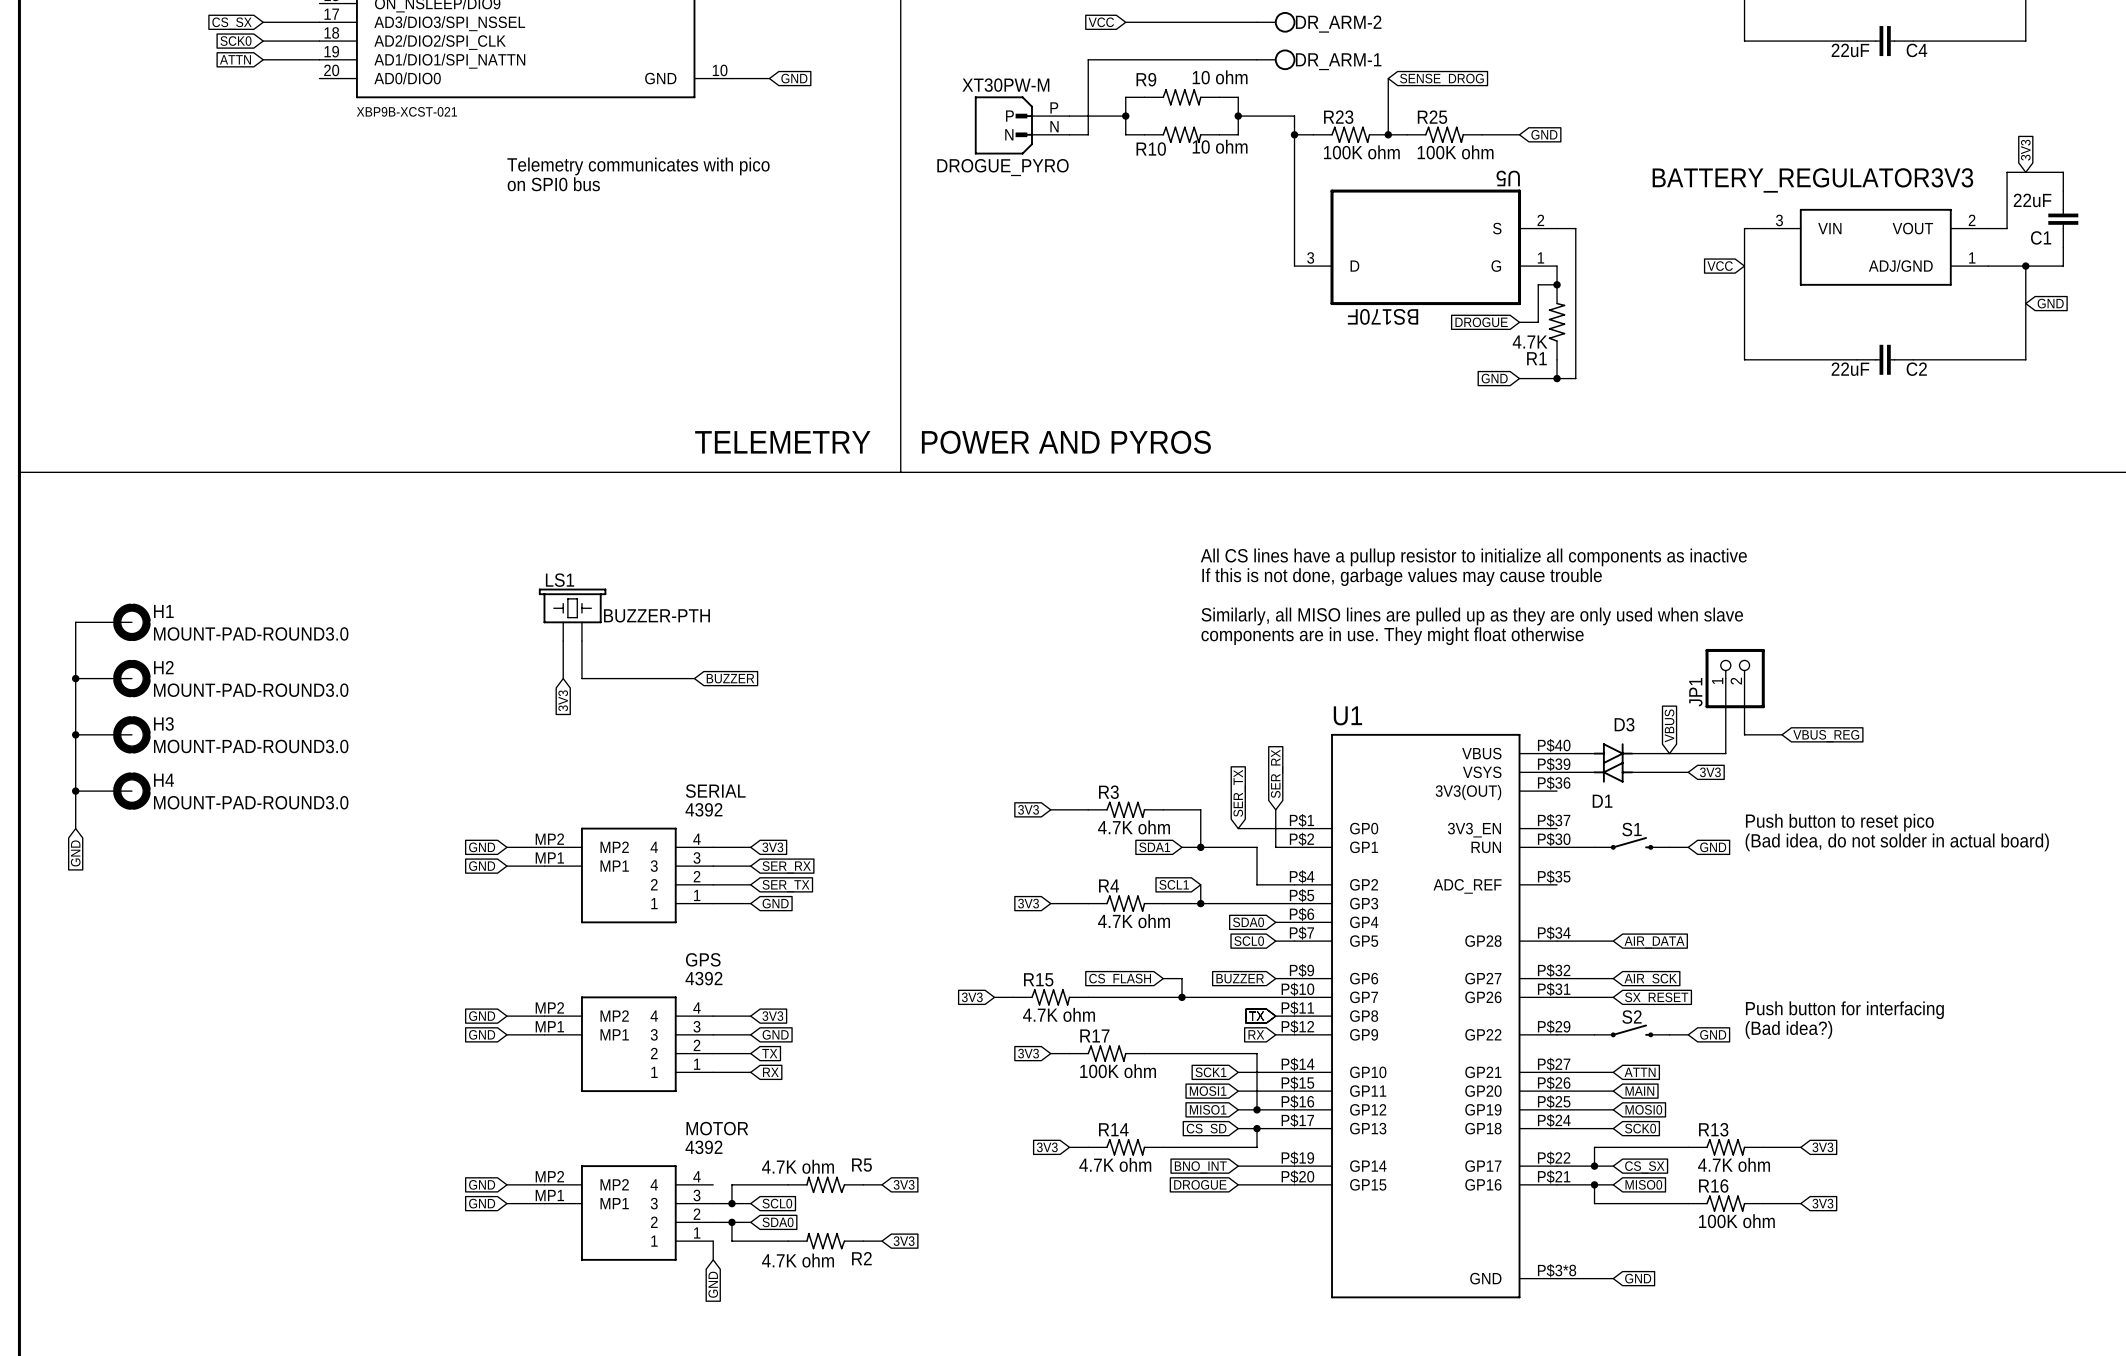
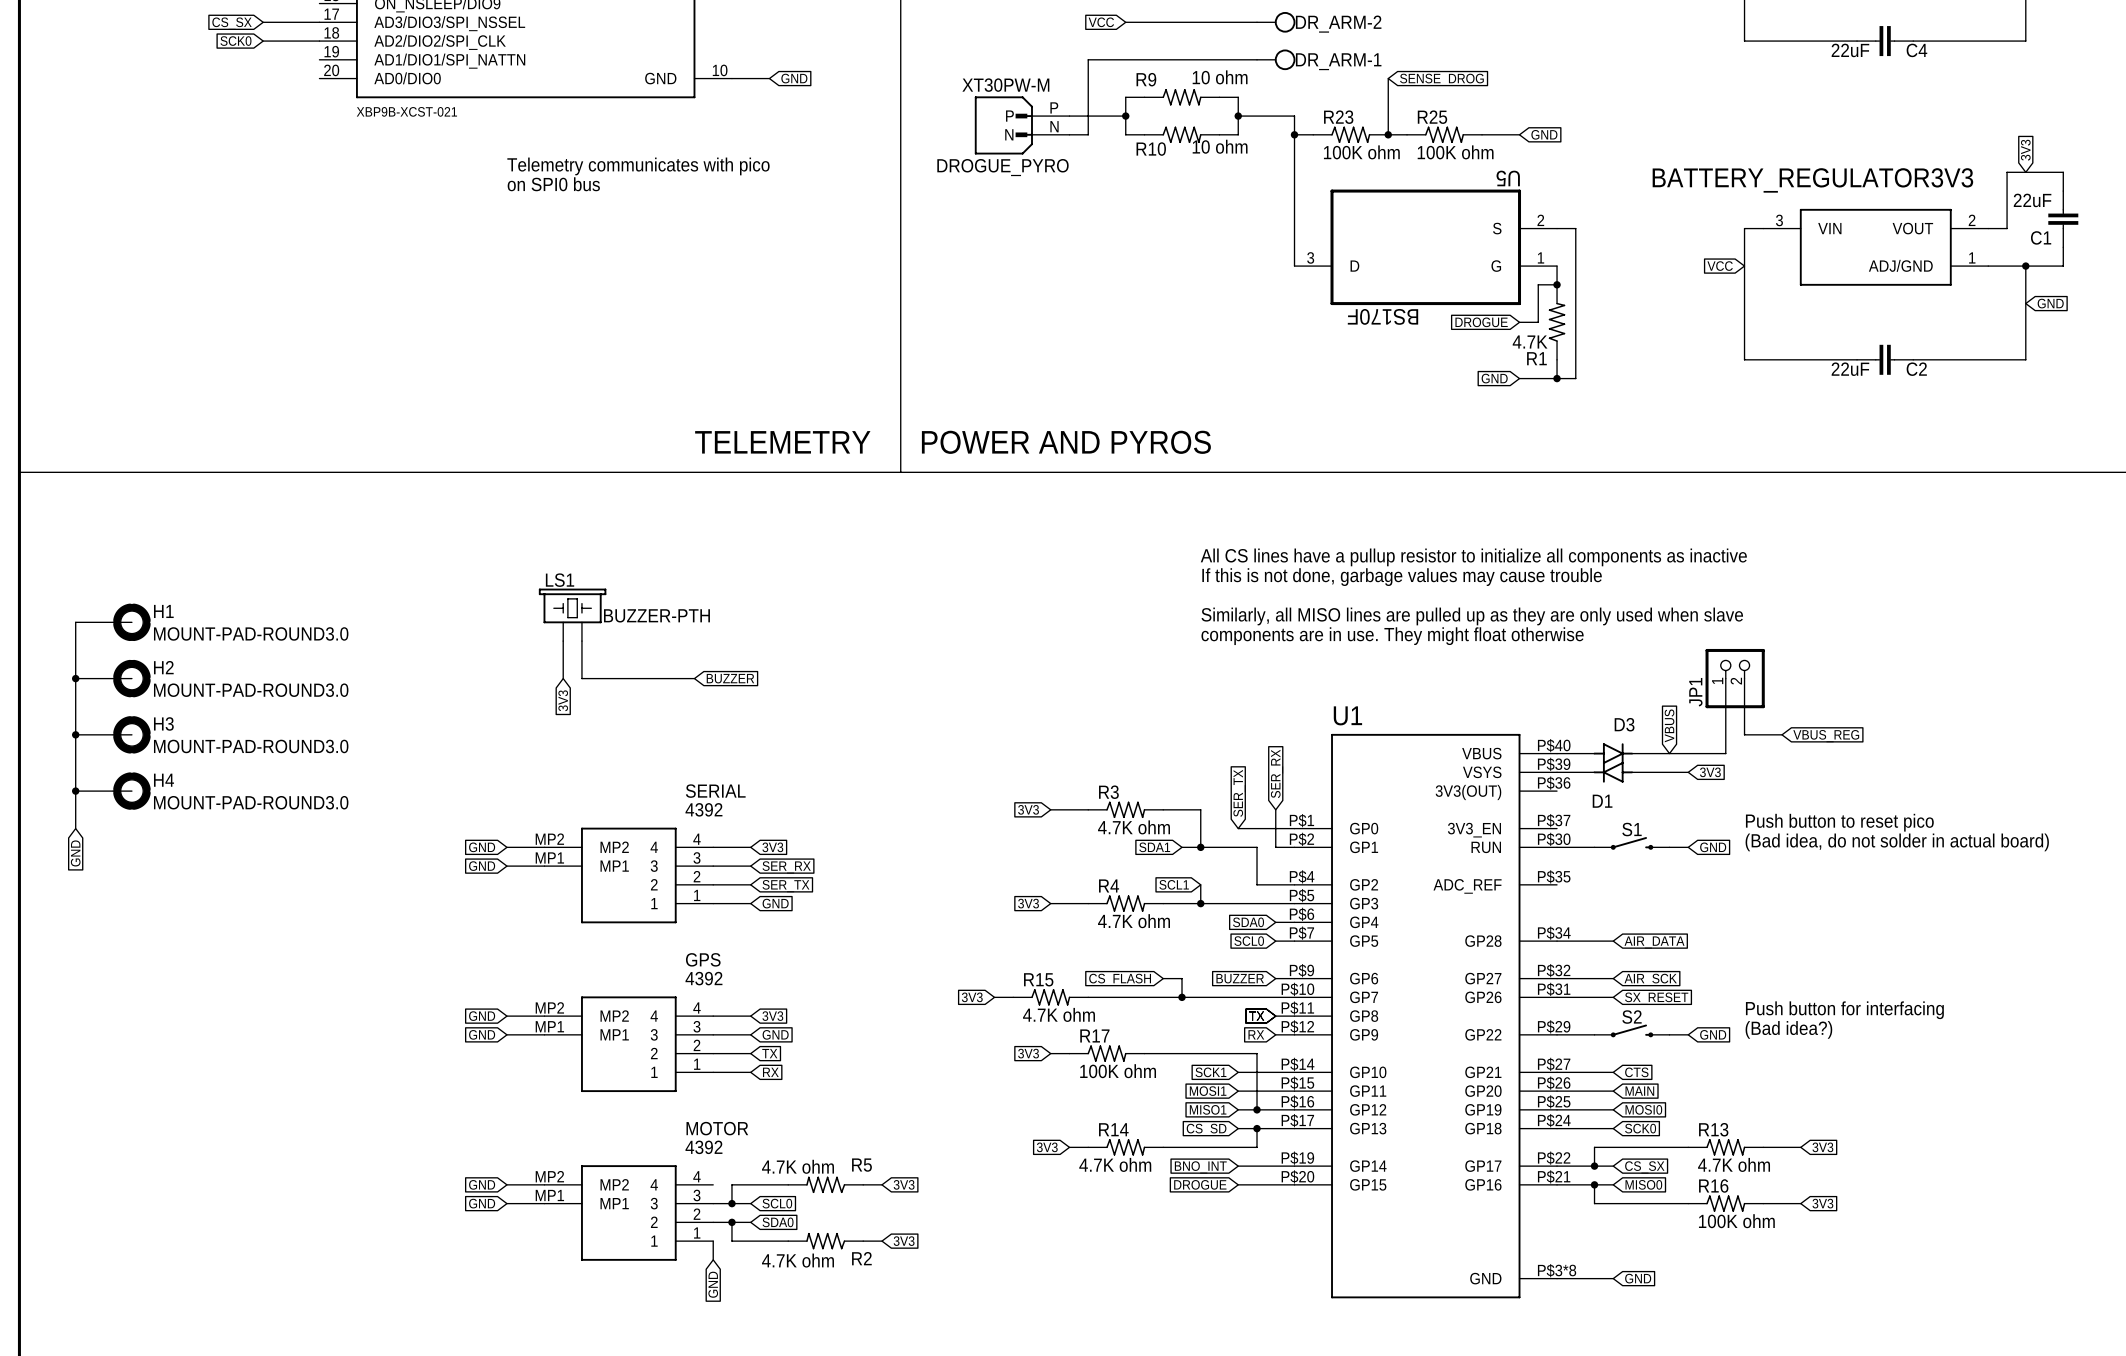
global label: ATTN (235, 59) -> none
wire: (263, 59) (319, 59) -> none
global label: ATTN (1640, 1072) -> CTS (1636, 1072)

